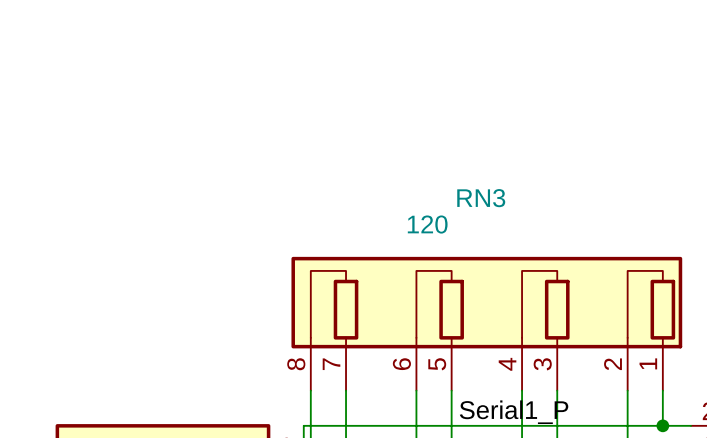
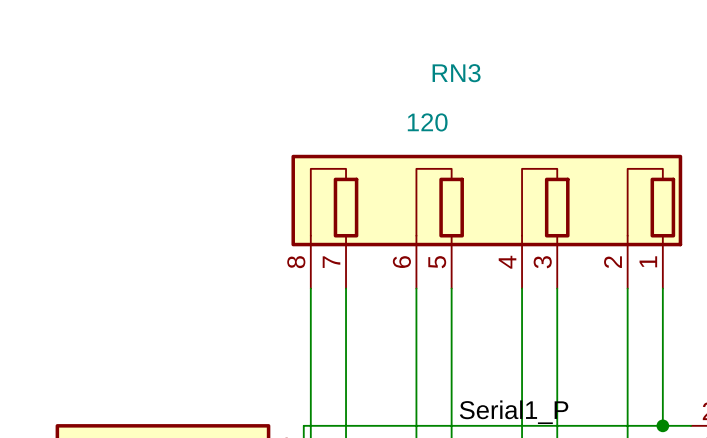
RN3 name position: RN3 (481, 198) -> RN3 (456, 73)
RN3 position: (486, 323) -> (486, 221)

